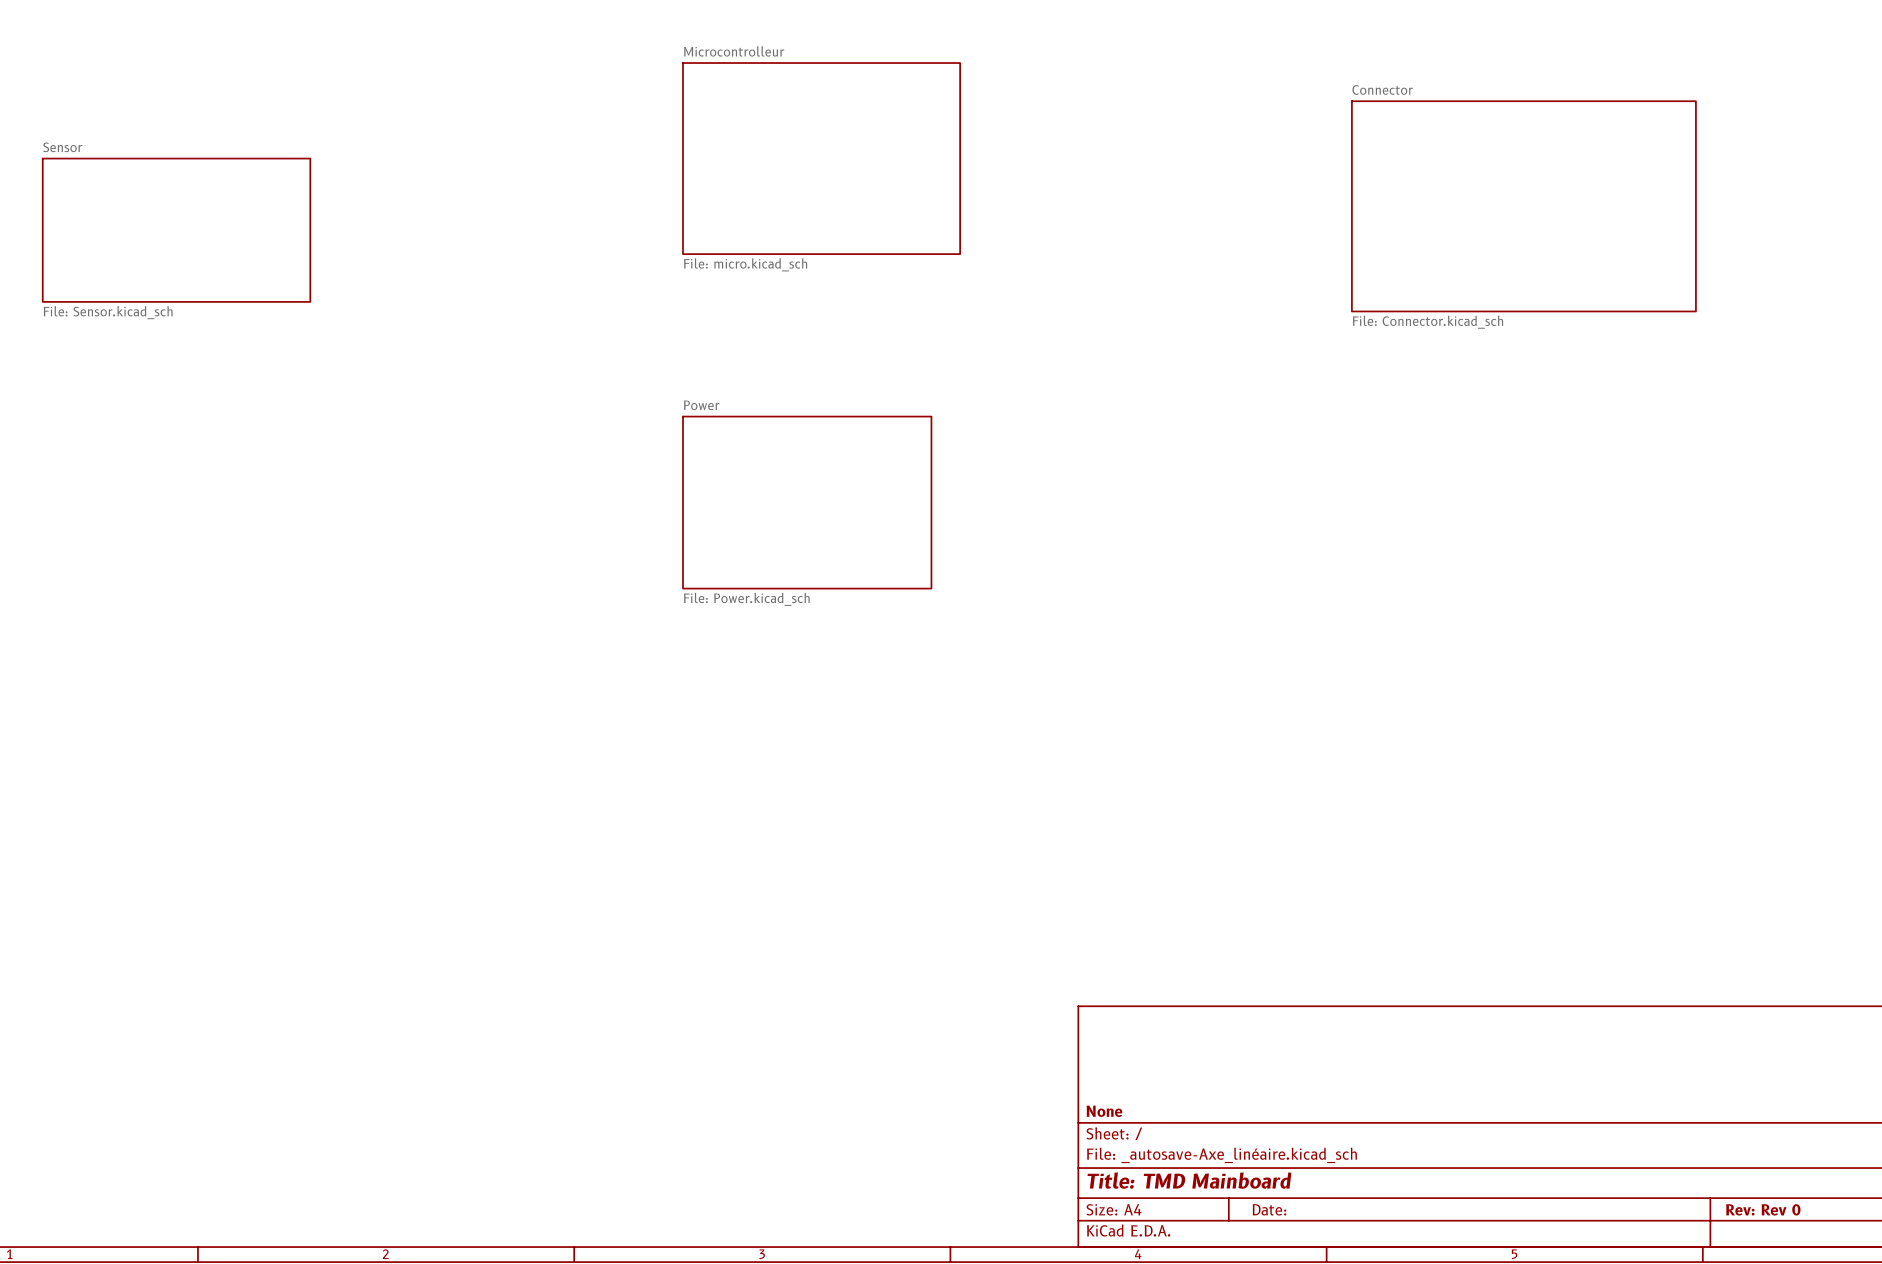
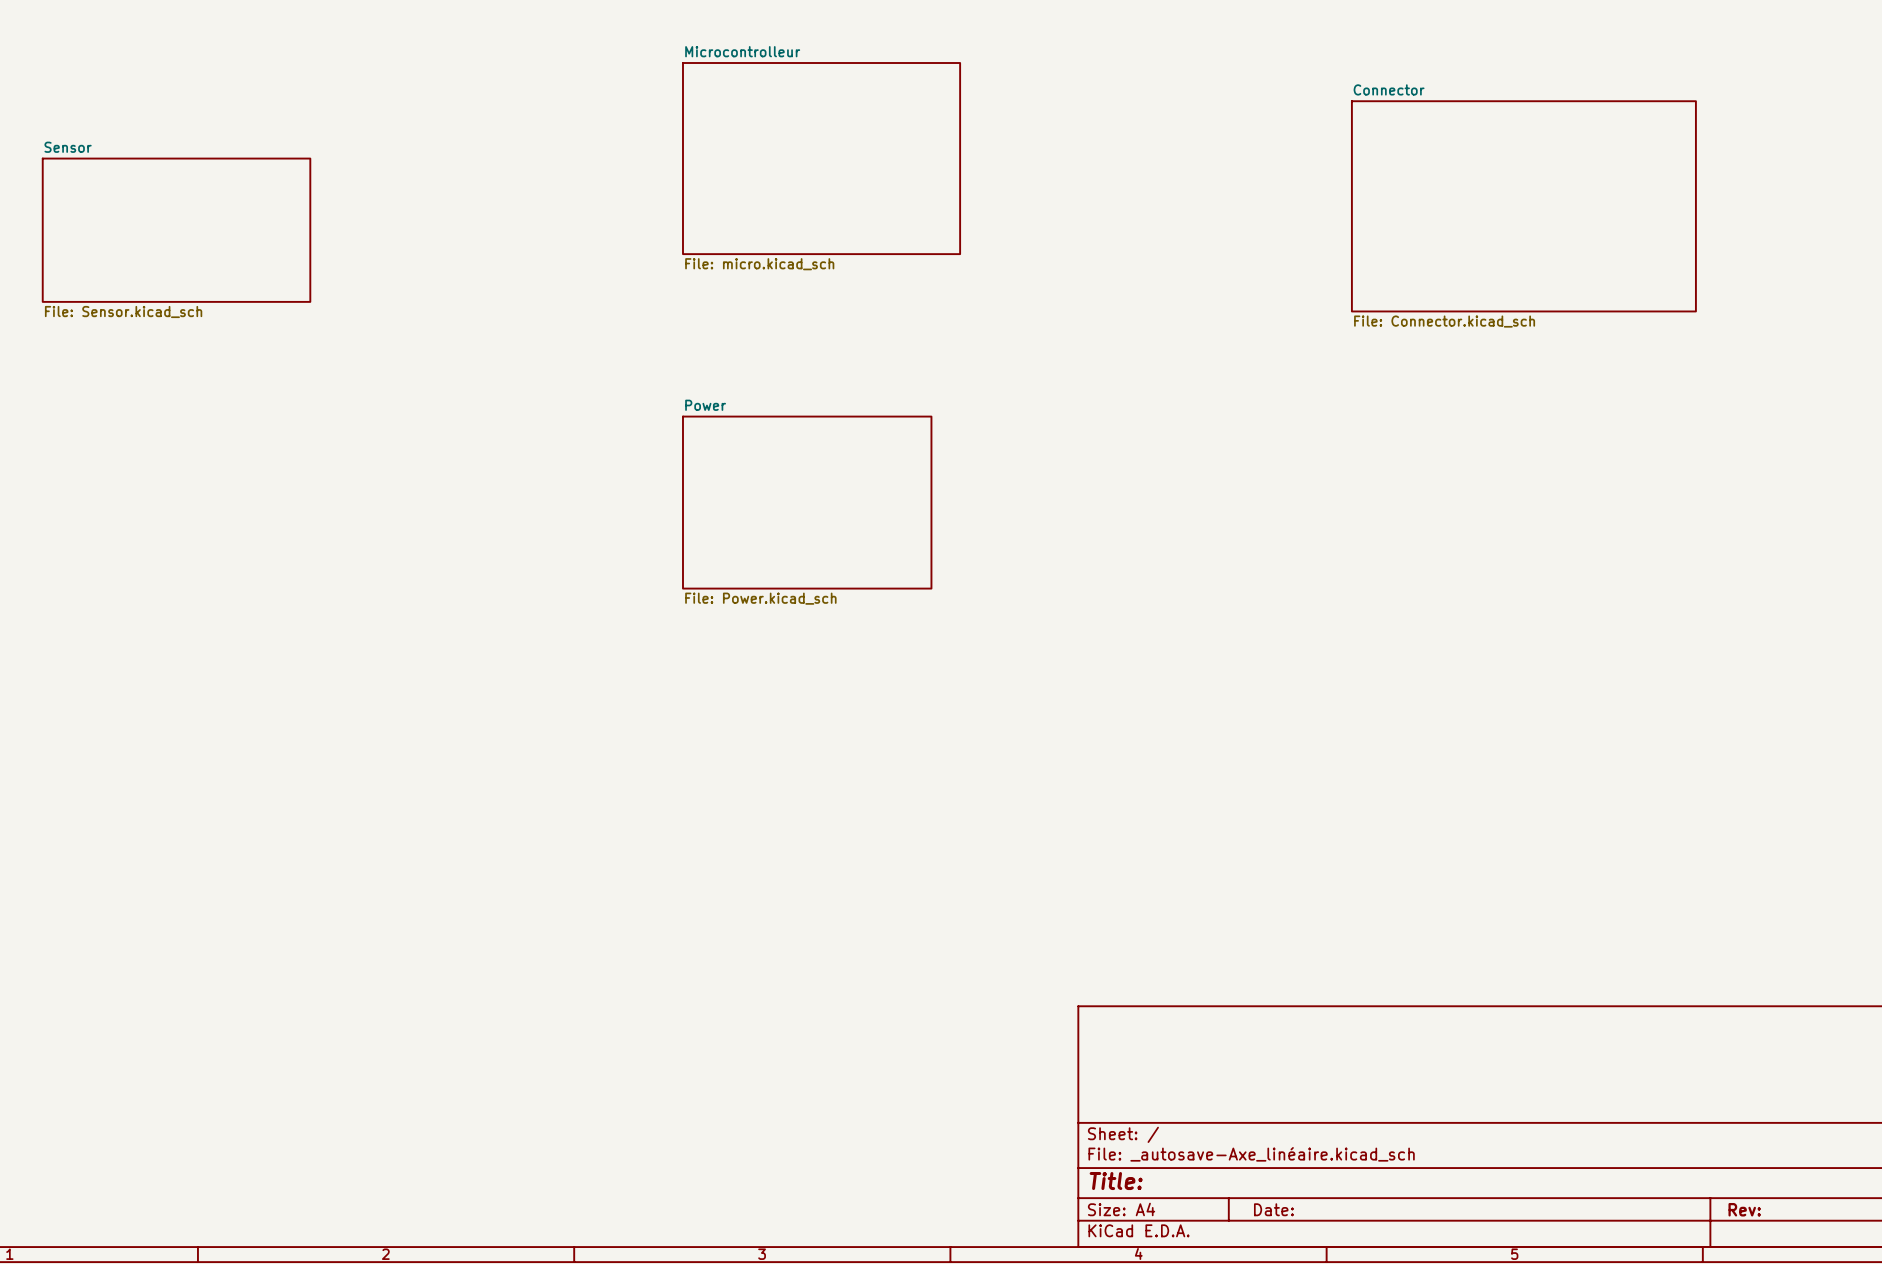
title block: None (1104, 1111) -> none
title block: Title: TMD Mainboard (1189, 1180) -> Title: (1116, 1181)
title block: Rev: Rev 0 (1763, 1209) -> Rev: (1744, 1209)

